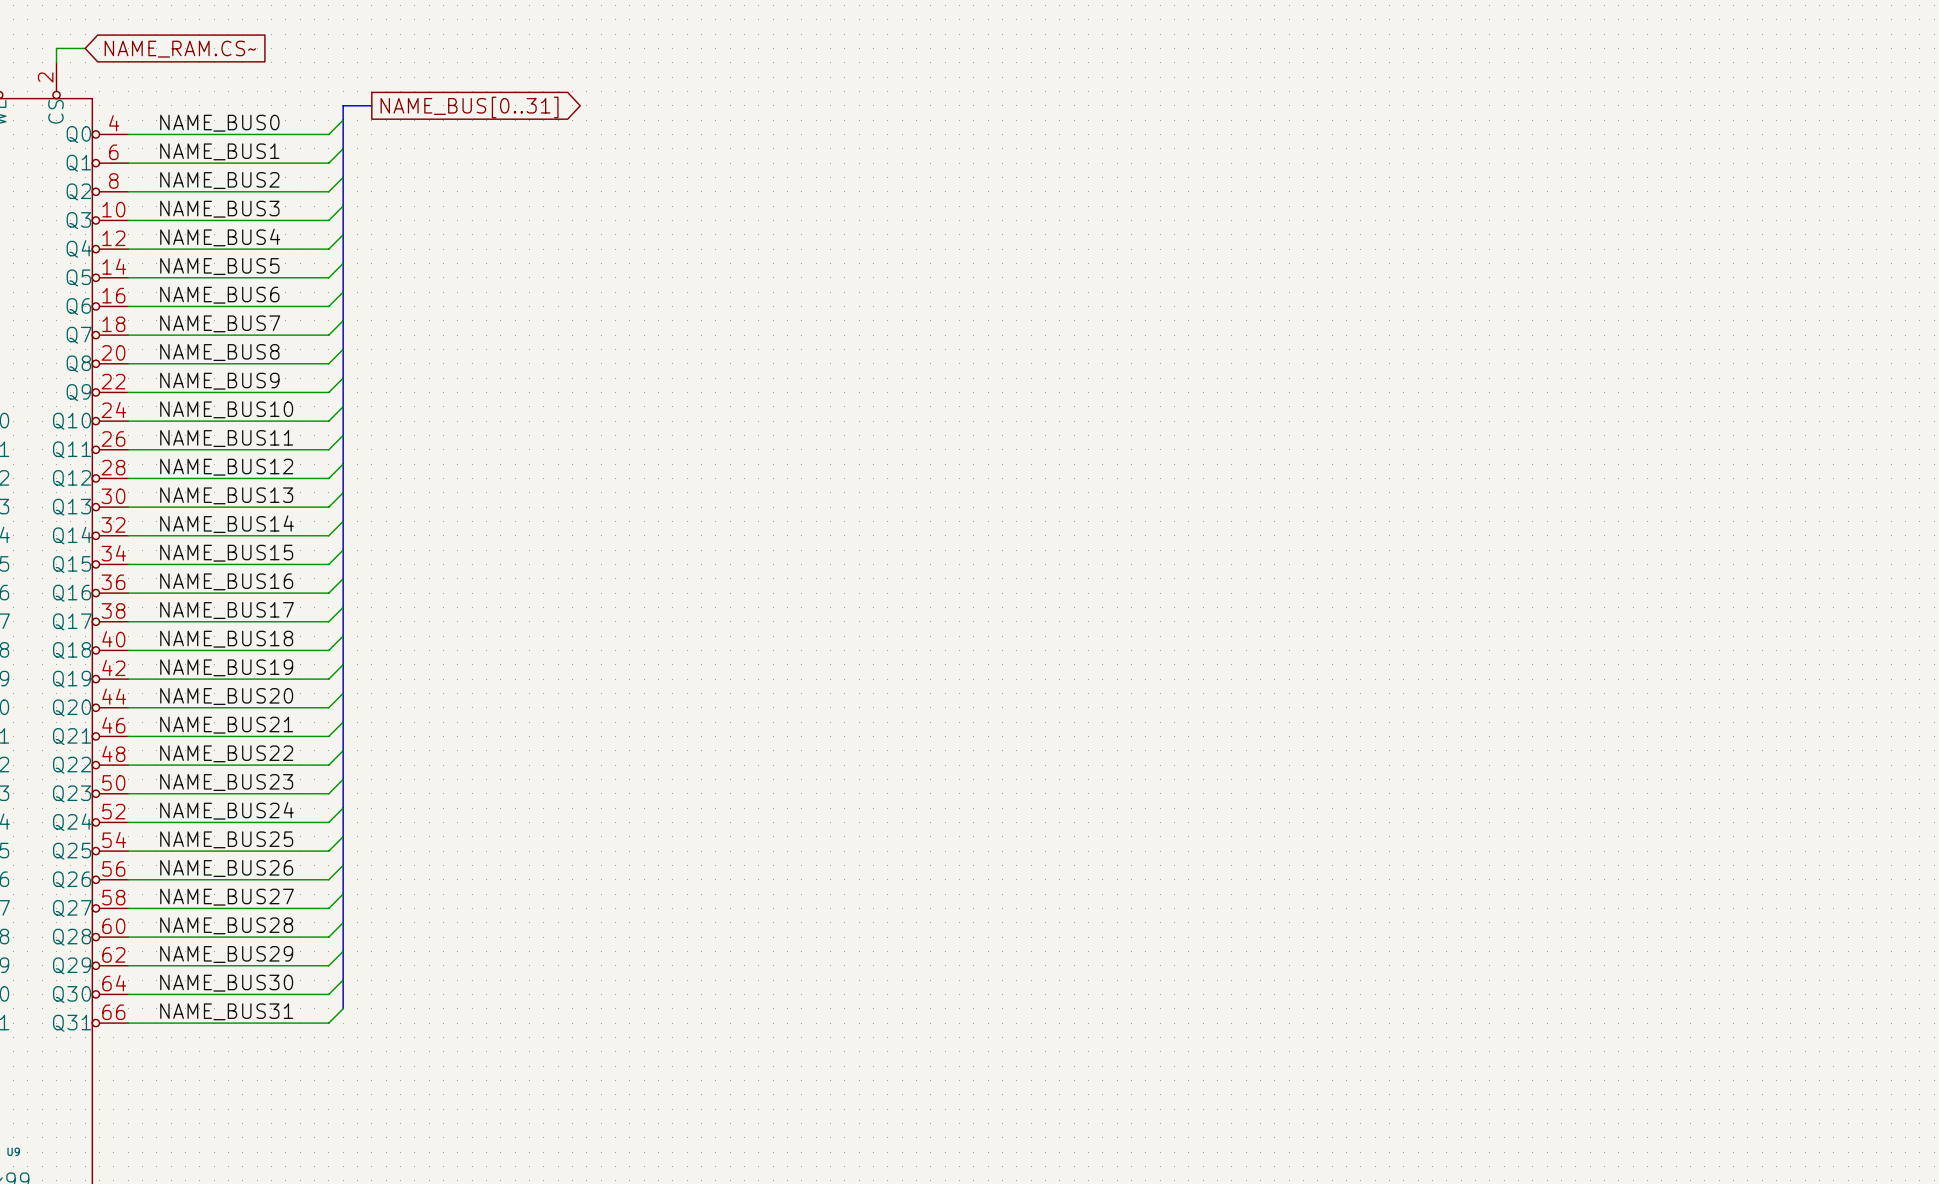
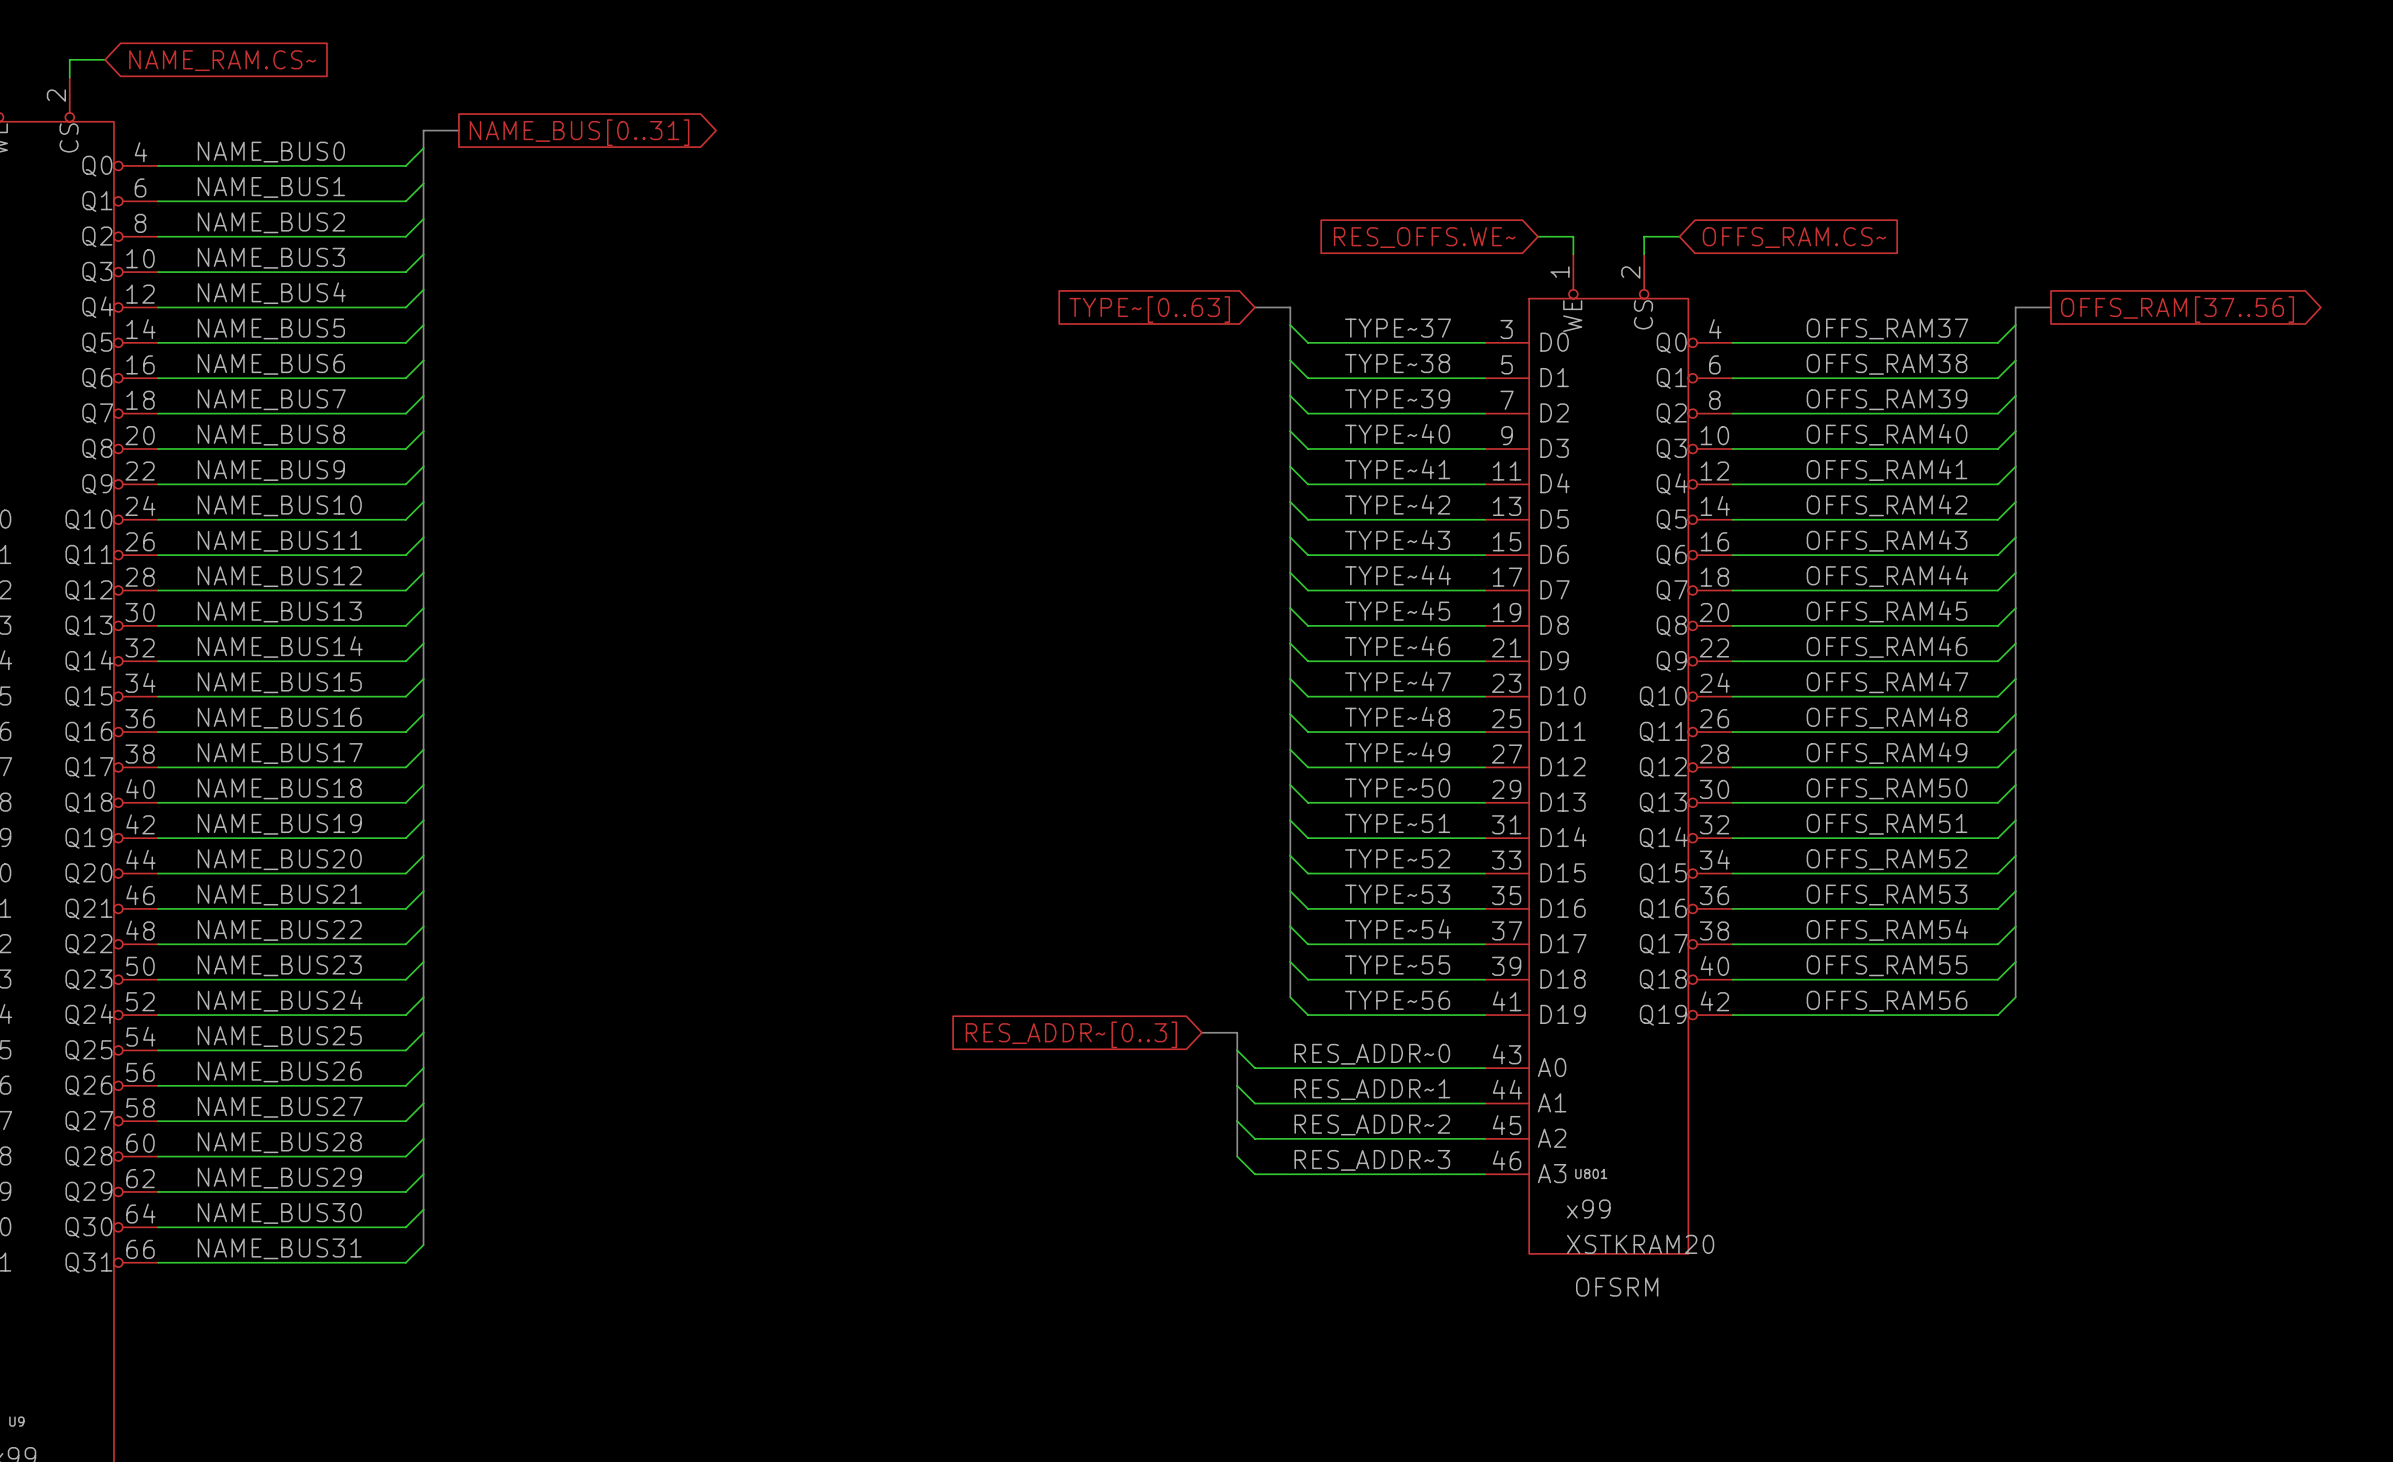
wire: none -> (1537, 236) (1573, 236) (1573, 254)
wire: none -> (1679, 236) (1644, 236) (1644, 254)
global label: none -> RES_OFFS.WE~ (1424, 237)
global label: none -> OFFS_RAM.CS~ (1794, 237)
bus: none -> (1254, 307) (1290, 307) (1290, 997)
bus: none -> (2051, 307) (2015, 307) (2015, 997)
global label: none -> TYPE~[0..63] (1149, 309)
global label: none -> OFFS_RAM[37..56] (2177, 309)
wire: none -> (1290, 325) (1308, 342) (1484, 342)
wire: none -> (2015, 325) (1997, 342) (1732, 342)
label: none -> TYPE~37 (1398, 328)
label: none -> OFFS_RAM37 (1887, 328)
wire: none -> (1290, 360) (1308, 378) (1484, 378)
wire: none -> (2015, 360) (1997, 378) (1732, 378)
label: none -> TYPE~38 (1397, 363)
label: none -> OFFS_RAM38 (1887, 364)
wire: none -> (1290, 395) (1308, 413) (1484, 413)
wire: none -> (2015, 395) (1997, 413) (1732, 413)
label: none -> TYPE~39 (1397, 398)
label: none -> OFFS_RAM39 (1887, 399)
wire: none -> (1290, 431) (1308, 448) (1484, 448)
wire: none -> (2015, 431) (1997, 448) (1732, 448)
label: none -> TYPE~40 (1397, 433)
label: none -> OFFS_RAM40 (1887, 434)
wire: none -> (1290, 466) (1308, 484) (1484, 484)
wire: none -> (2015, 466) (1997, 484) (1732, 484)
label: none -> TYPE~41 (1397, 469)
label: none -> OFFS_RAM41 (1887, 470)
wire: none -> (1290, 502) (1308, 519) (1484, 519)
wire: none -> (2015, 502) (1997, 519) (1732, 519)
label: none -> TYPE~42 (1397, 504)
label: none -> OFFS_RAM42 (1887, 505)
wire: none -> (1290, 537) (1308, 555) (1484, 555)
wire: none -> (2015, 537) (1997, 555) (1732, 555)
label: none -> TYPE~43 (1397, 539)
label: none -> OFFS_RAM43 (1887, 540)
wire: none -> (1290, 572) (1308, 590) (1484, 590)
wire: none -> (2015, 572) (1997, 590) (1732, 590)
label: none -> TYPE~44 (1398, 575)
label: none -> OFFS_RAM44 (1887, 576)
wire: none -> (1290, 608) (1308, 625) (1484, 625)
wire: none -> (2015, 608) (1997, 625) (1732, 625)
label: none -> TYPE~45 (1397, 610)
label: none -> OFFS_RAM45 (1887, 611)
wire: none -> (1290, 643) (1308, 661) (1484, 661)
wire: none -> (2015, 643) (1997, 661) (1732, 661)
label: none -> TYPE~46 (1397, 646)
label: none -> OFFS_RAM46 (1887, 646)
wire: none -> (1290, 678) (1308, 696) (1484, 696)
wire: none -> (2015, 678) (1997, 696) (1732, 696)
label: none -> TYPE~47 (1398, 681)
label: none -> OFFS_RAM47 (1887, 682)
wire: none -> (1290, 714) (1308, 732) (1484, 732)
wire: none -> (2015, 714) (1997, 732) (1732, 732)
label: none -> TYPE~48 (1397, 716)
label: none -> OFFS_RAM48 (1887, 717)
wire: none -> (1290, 749) (1308, 767) (1484, 767)
wire: none -> (2015, 749) (1997, 767) (1732, 767)
label: none -> TYPE~49 (1397, 752)
label: none -> OFFS_RAM49 (1887, 753)
U801: none -> XSTKRAM20 (1608, 754)
wire: none -> (1290, 785) (1308, 802) (1484, 802)
wire: none -> (2015, 785) (1997, 802) (1732, 802)
label: none -> TYPE~50 (1397, 788)
label: none -> OFFS_RAM50 (1887, 788)
wire: none -> (1290, 820) (1308, 838) (1484, 838)
wire: none -> (2015, 820) (1997, 838) (1732, 838)
label: none -> TYPE~51 (1397, 823)
label: none -> OFFS_RAM51 (1887, 824)
wire: none -> (1290, 855) (1308, 873) (1484, 873)
wire: none -> (2015, 855) (1997, 873) (1732, 873)
label: none -> TYPE~52 (1397, 858)
label: none -> OFFS_RAM52 (1887, 859)
wire: none -> (1290, 891) (1308, 908) (1484, 908)
wire: none -> (2015, 891) (1997, 908) (1732, 908)
label: none -> TYPE~53 (1397, 894)
label: none -> OFFS_RAM53 (1887, 895)
wire: none -> (1290, 926) (1308, 944) (1484, 944)
wire: none -> (2015, 926) (1997, 944) (1732, 944)
label: none -> TYPE~54 (1398, 929)
label: none -> OFFS_RAM54 (1887, 930)
wire: none -> (1290, 961) (1308, 979) (1484, 979)
wire: none -> (2015, 961) (1997, 979) (1732, 979)
label: none -> TYPE~55 (1397, 964)
label: none -> OFFS_RAM55 (1887, 965)
wire: none -> (1290, 997) (1308, 1015) (1484, 1015)
wire: none -> (2015, 997) (1997, 1015) (1732, 1015)
label: none -> TYPE~56 (1397, 1000)
label: none -> OFFS_RAM56 (1887, 1001)
bus: none -> (1201, 1032) (1237, 1032) (1237, 1156)
global label: none -> RES_ADDR~[0..3] (1071, 1034)
wire: none -> (1237, 1050) (1254, 1068) (1484, 1068)
label: none -> RES_ADDR~0 (1372, 1054)
wire: none -> (1237, 1085) (1254, 1103) (1484, 1103)
label: none -> RES_ADDR~1 (1372, 1089)
wire: none -> (1237, 1121) (1254, 1138) (1484, 1138)
label: none -> RES_ADDR~2 (1372, 1125)
wire: none -> (1237, 1156) (1254, 1174) (1484, 1174)
label: none -> RES_ADDR~3 (1372, 1160)

